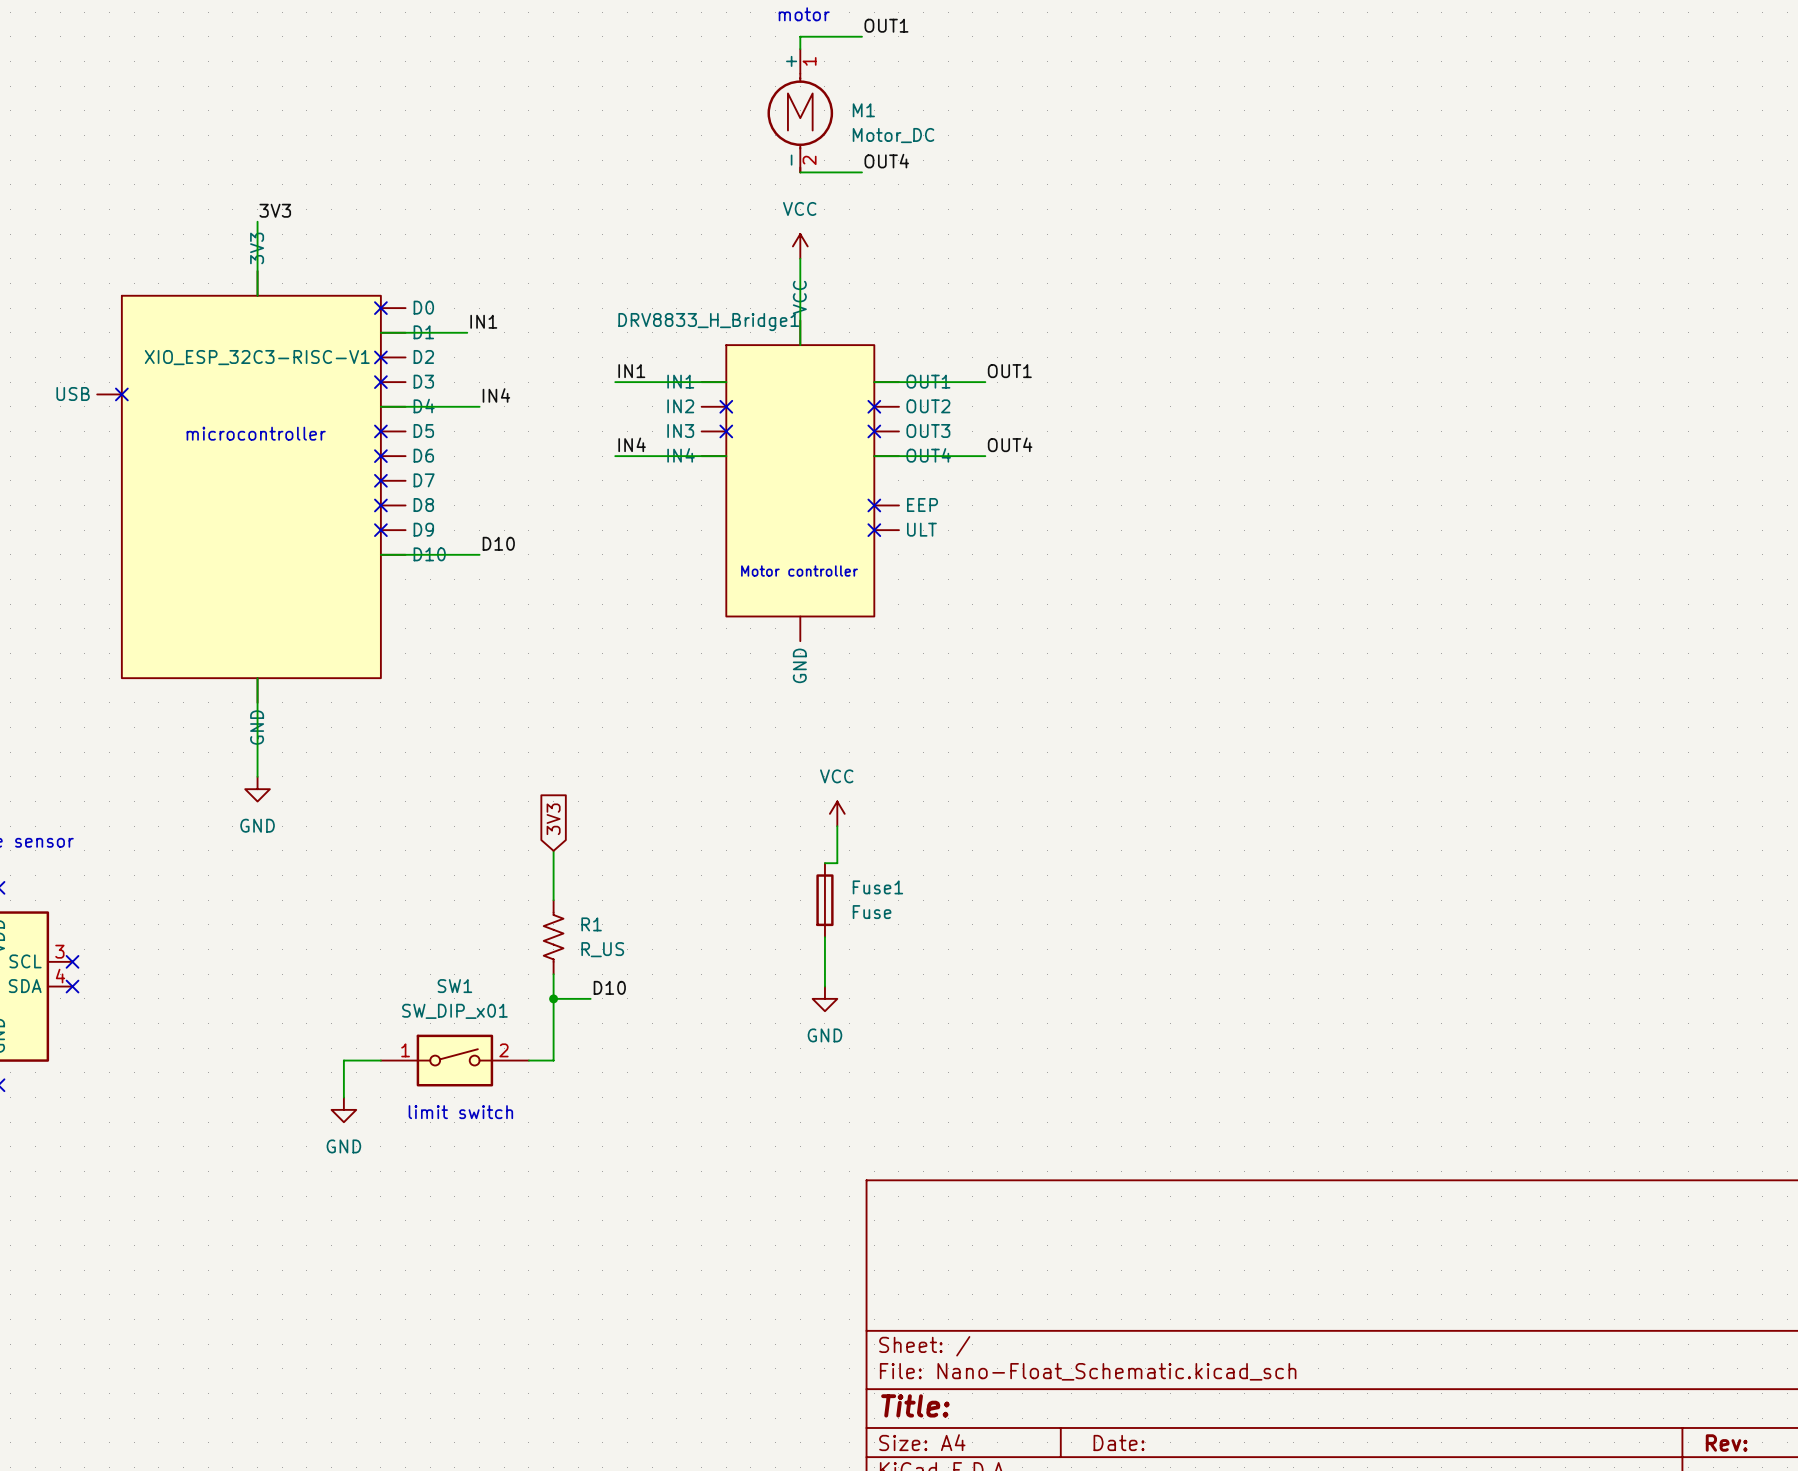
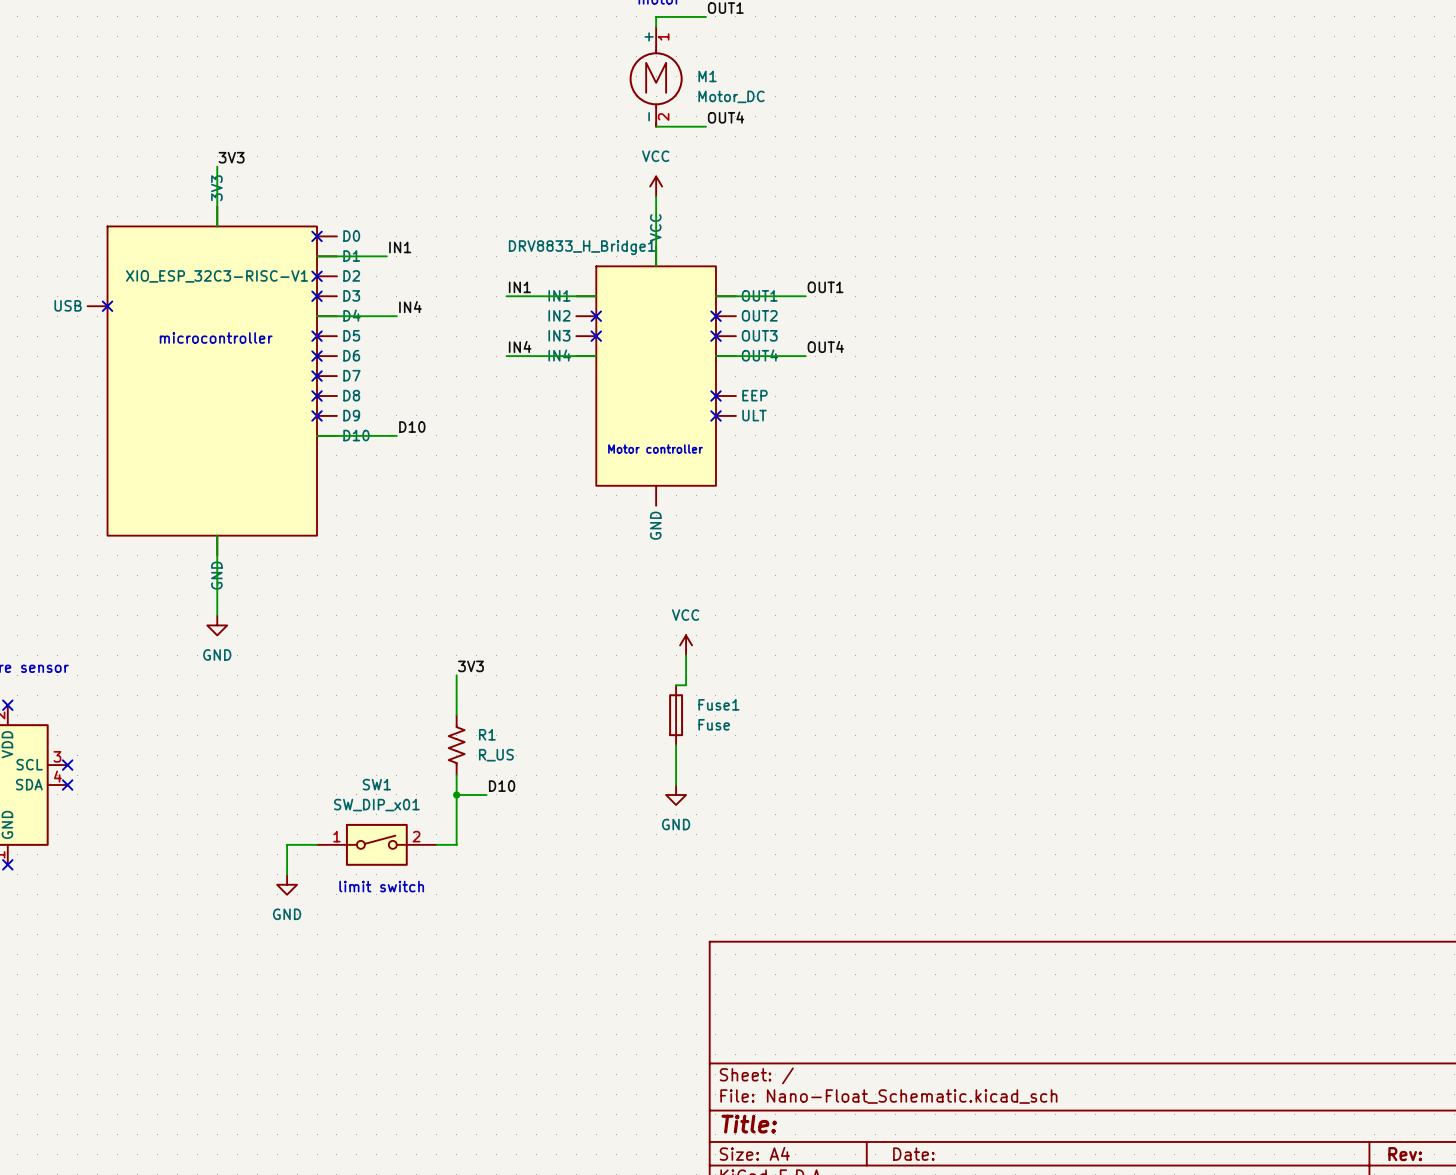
global label: 3V3 (553, 819) -> none
label: none -> 3V3 (470, 666)

